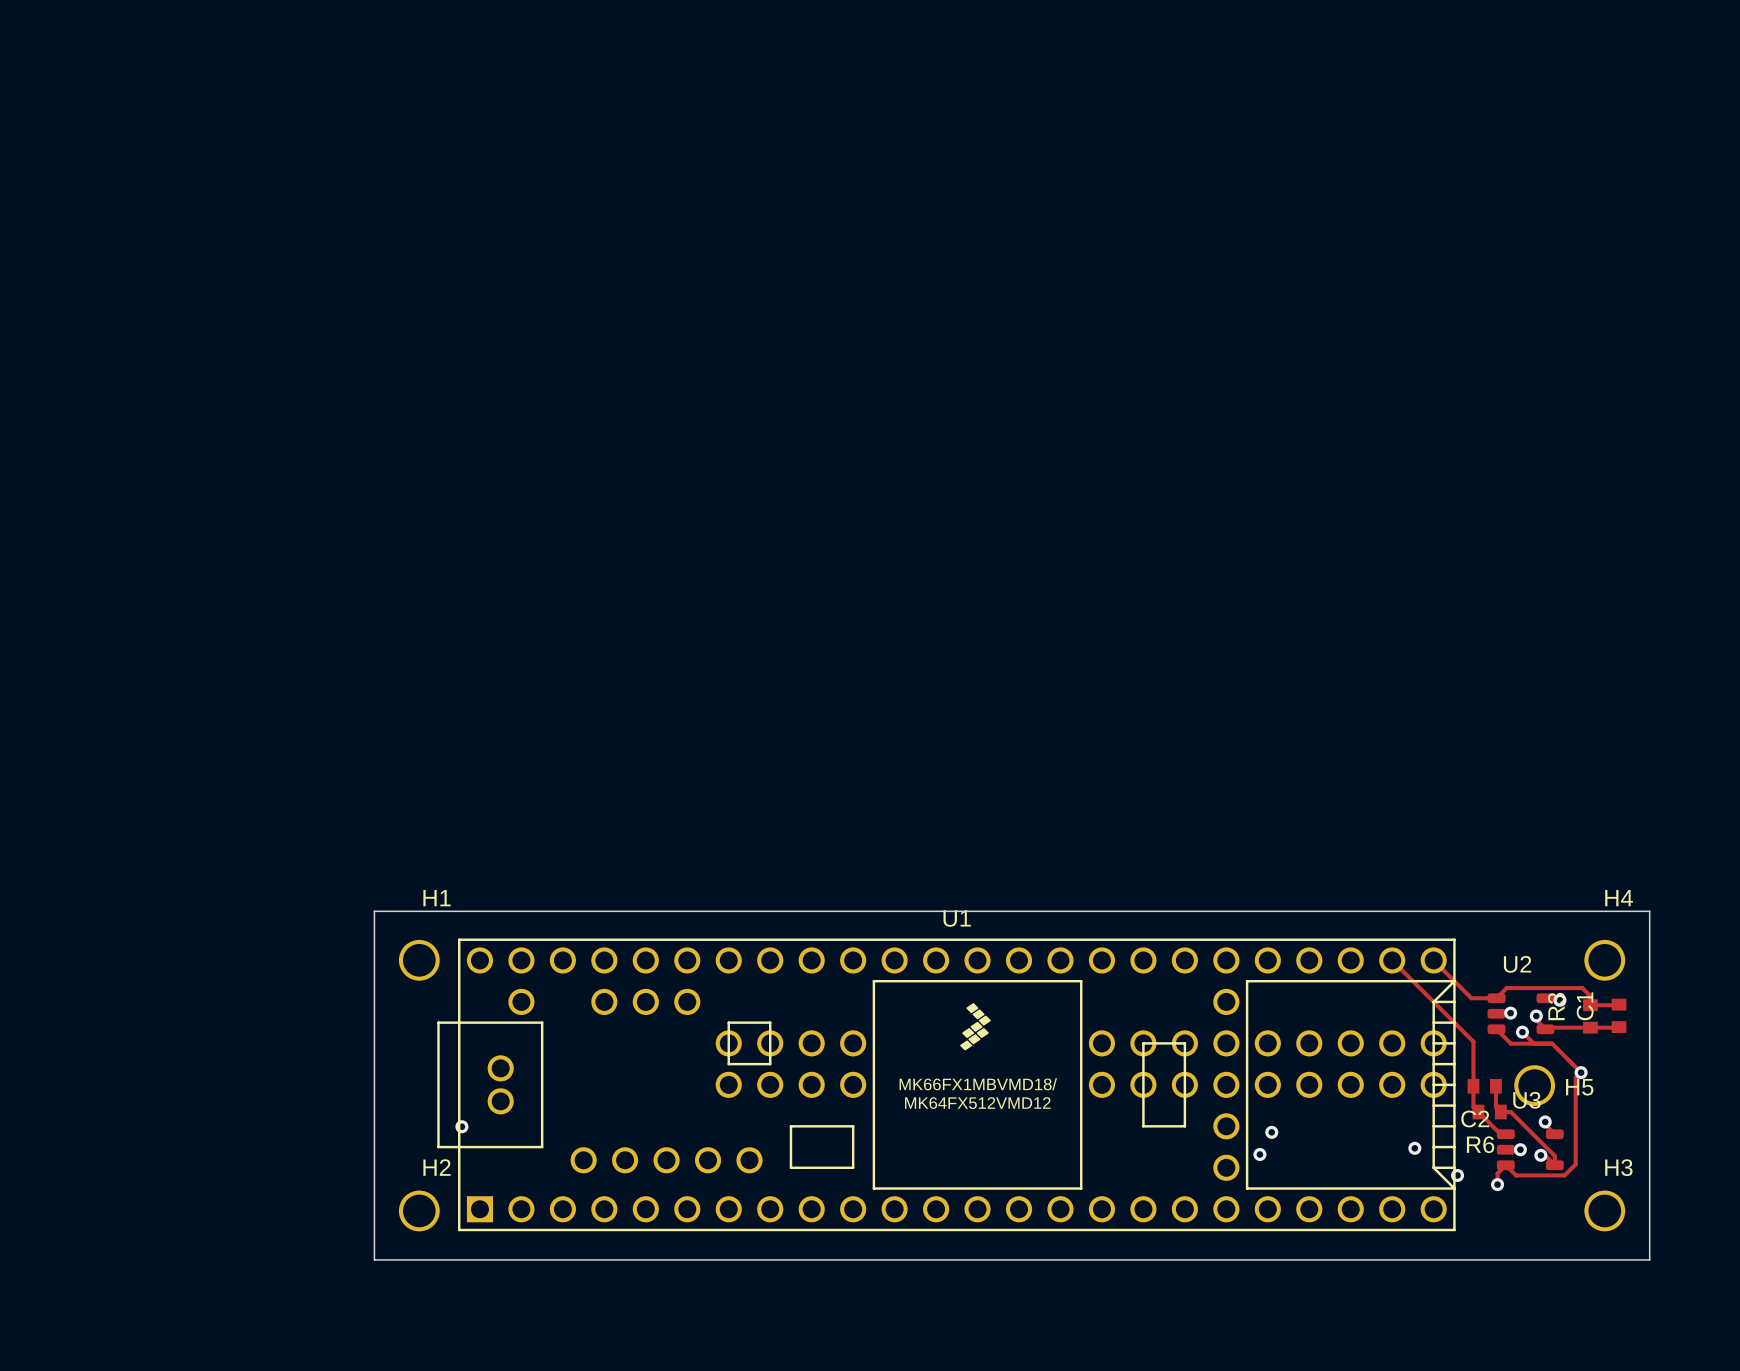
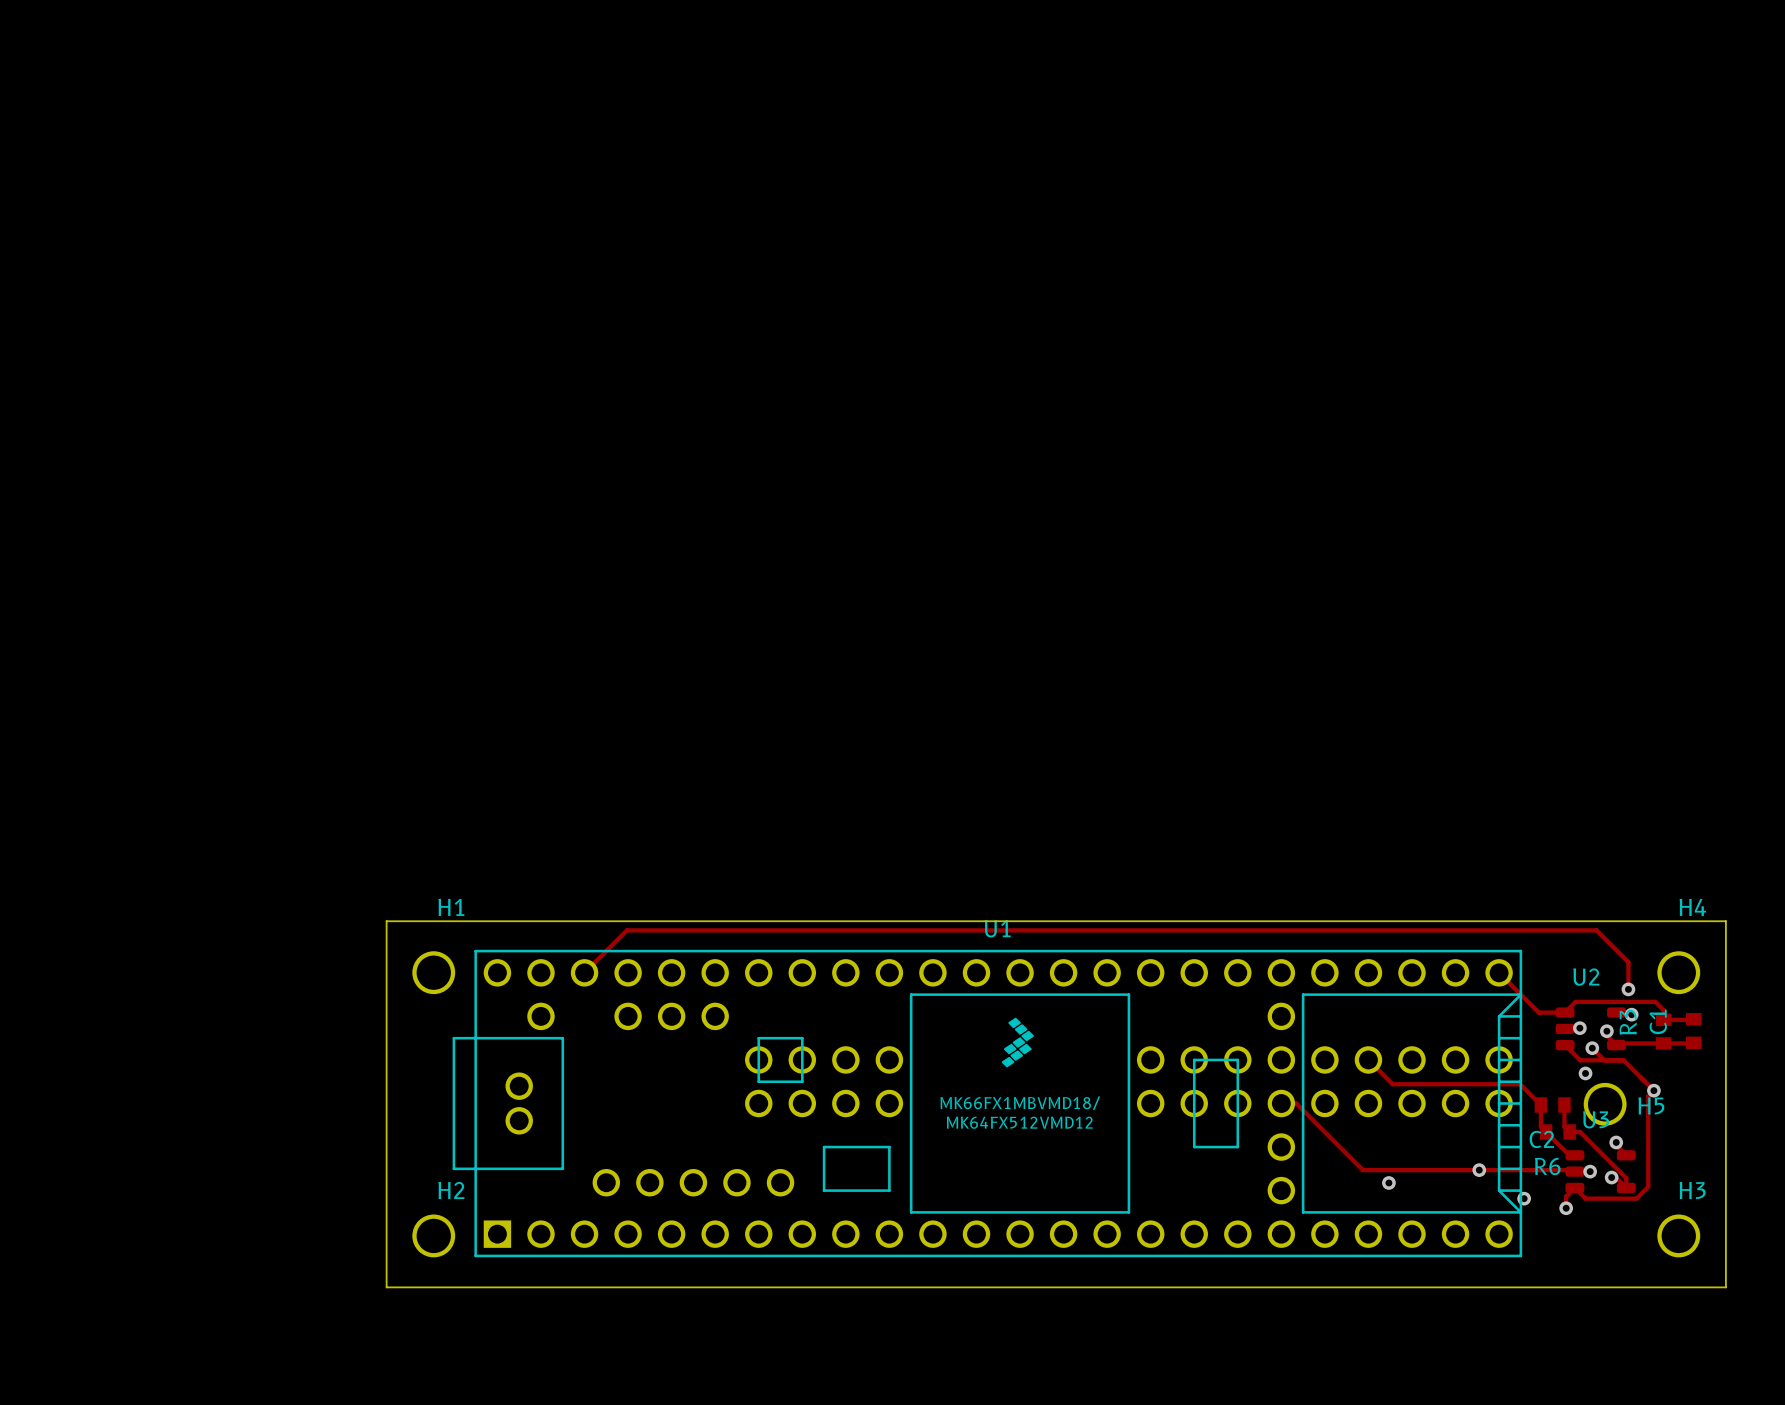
track: none -> (584, 972) (627, 930) (1596, 930) (1628, 962) (1628, 989)
track: (1392, 960) (1473, 1041) (1473, 1086) -> (1368, 1059) (1392, 1084) (1520, 1084) (1540, 1105)
via: none -> (1628, 989)
via: none -> (1585, 1073)
track: none -> (1281, 1103) (1296, 1103) (1362, 1170) (1573, 1170)
via: (461, 1126) -> none
via: (1271, 1132) -> none
via: (1259, 1154) -> none
via: none -> (1388, 1182)

